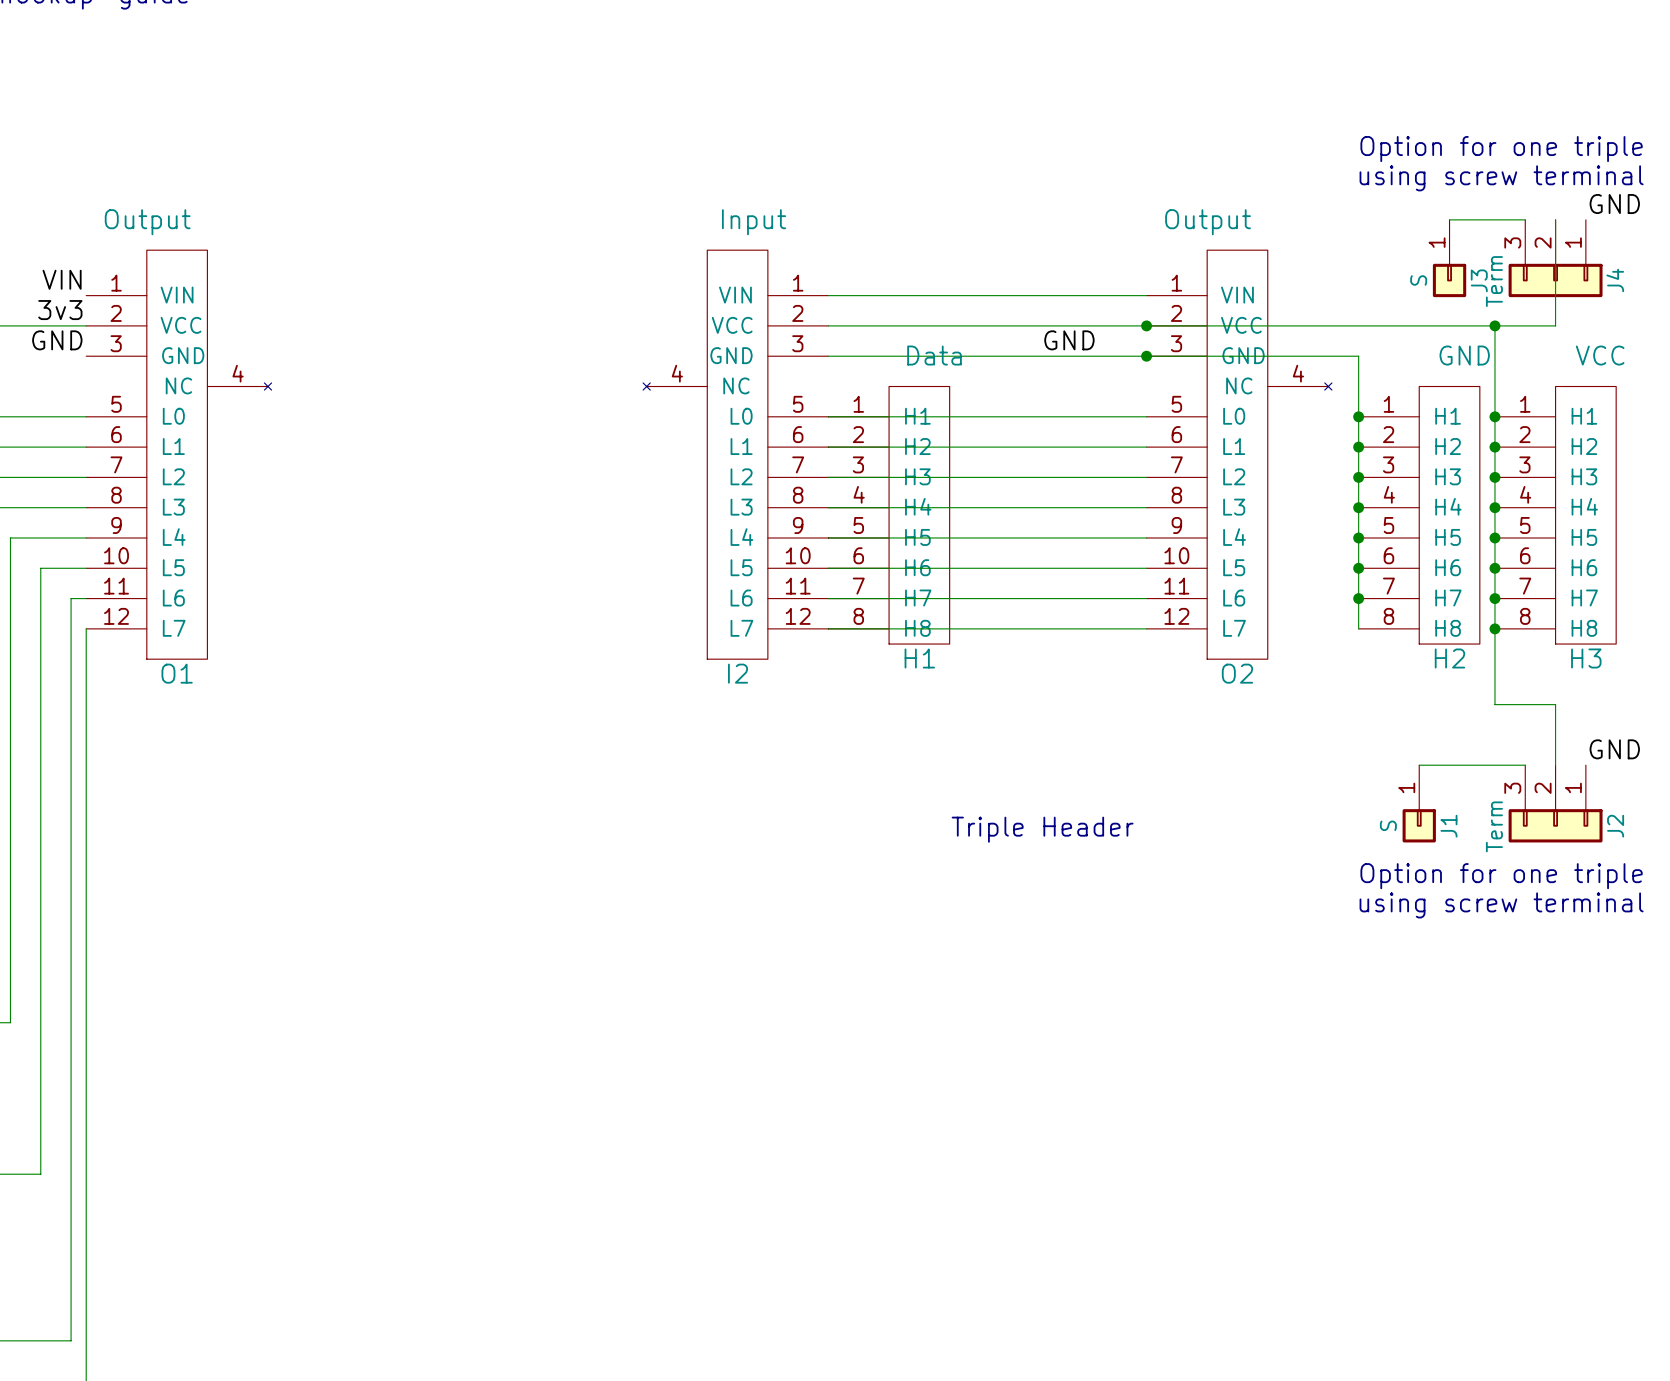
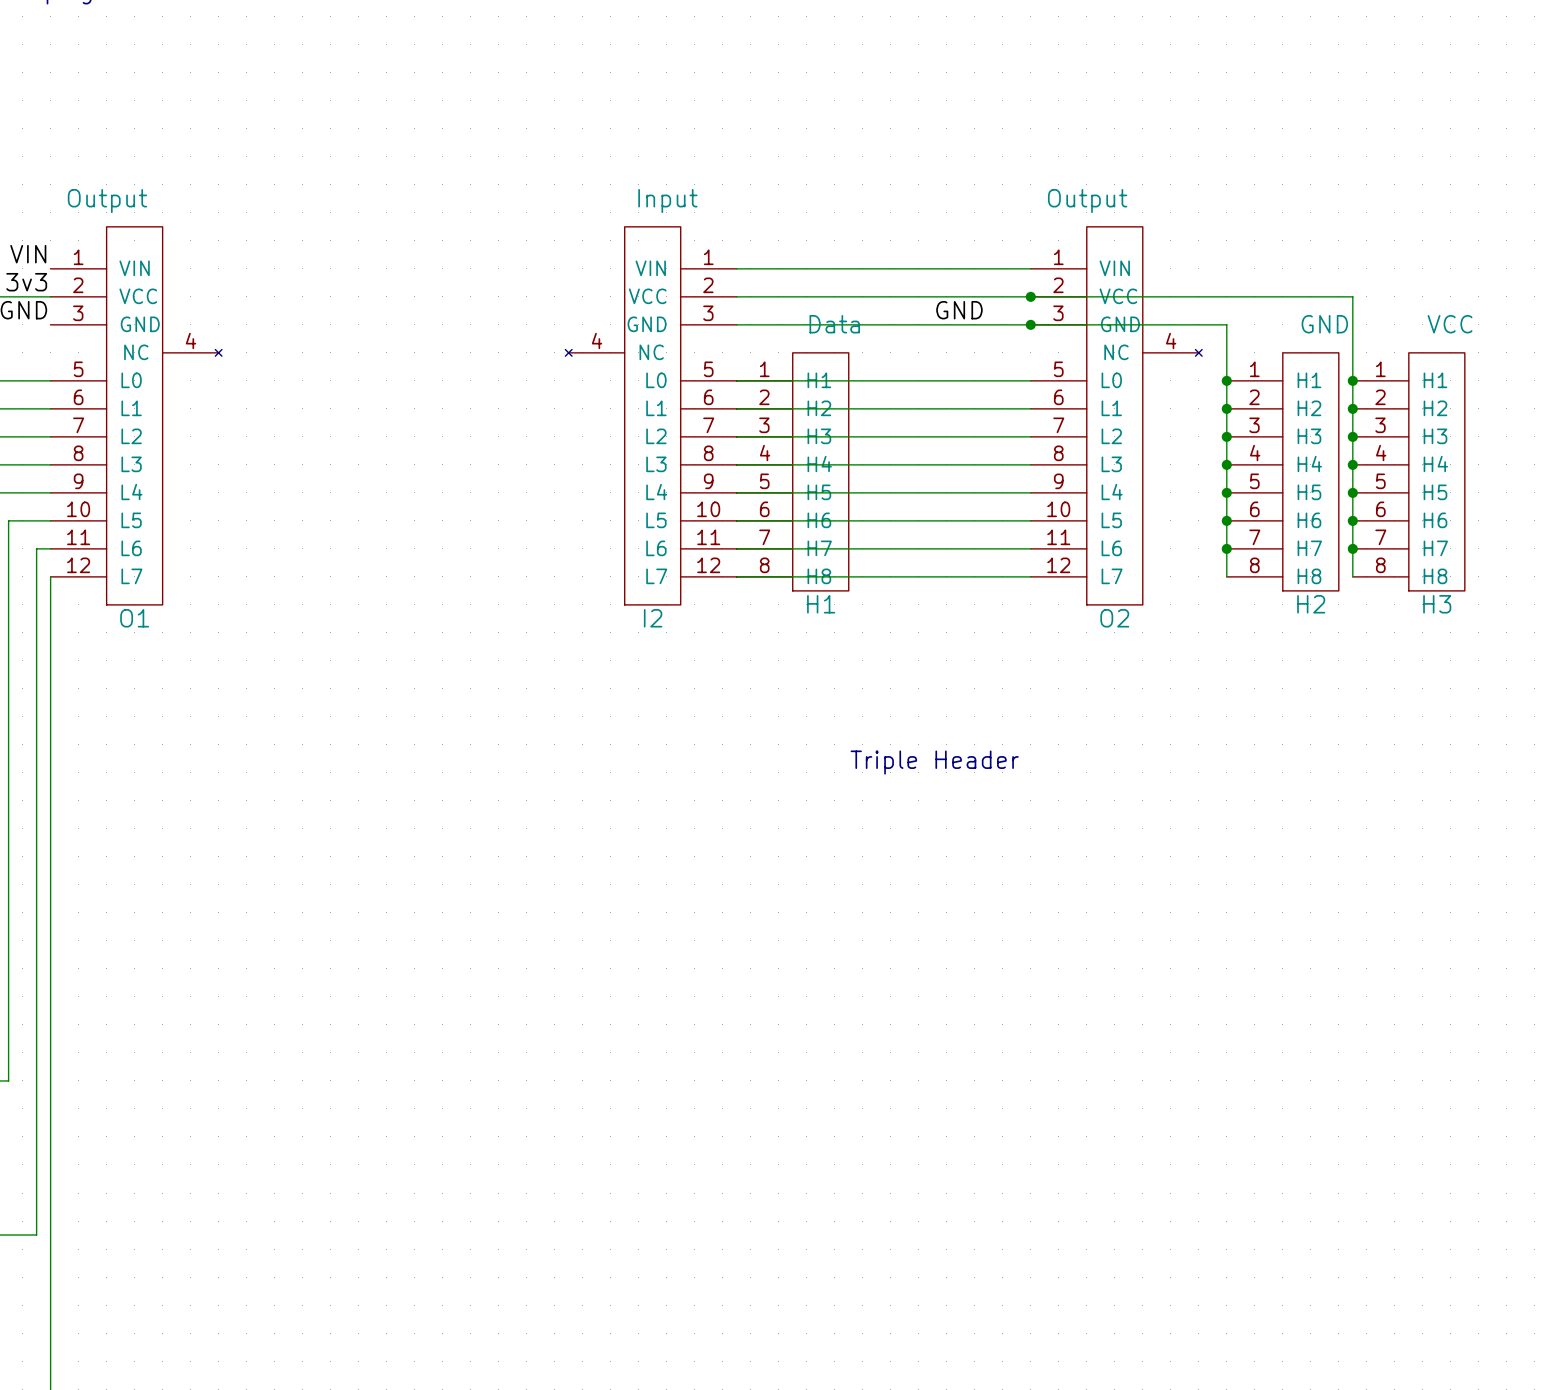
text: Option for one triple (1501, 149) -> none
text: using screw terminal (1501, 178) -> none
label: GND (1614, 204) -> none
wire: (1449, 219) (1525, 219) -> none
wire: (1555, 219) (1555, 325) (1494, 325) -> none
J3: S (1449, 258) -> none
J4: Term (1555, 258) -> none
junction: (1494, 325) -> none
wire: (1494, 628) (1494, 704) (1555, 704) (1555, 765) -> none
junction: (1494, 628) -> none
label: GND (1614, 749) -> none
wire: (1419, 765) (1525, 765) -> none
J1: S (1419, 803) -> none
J2: Term (1555, 803) -> none
text: Option for one triple (1501, 876) -> none
text: using screw terminal (1501, 905) -> none

